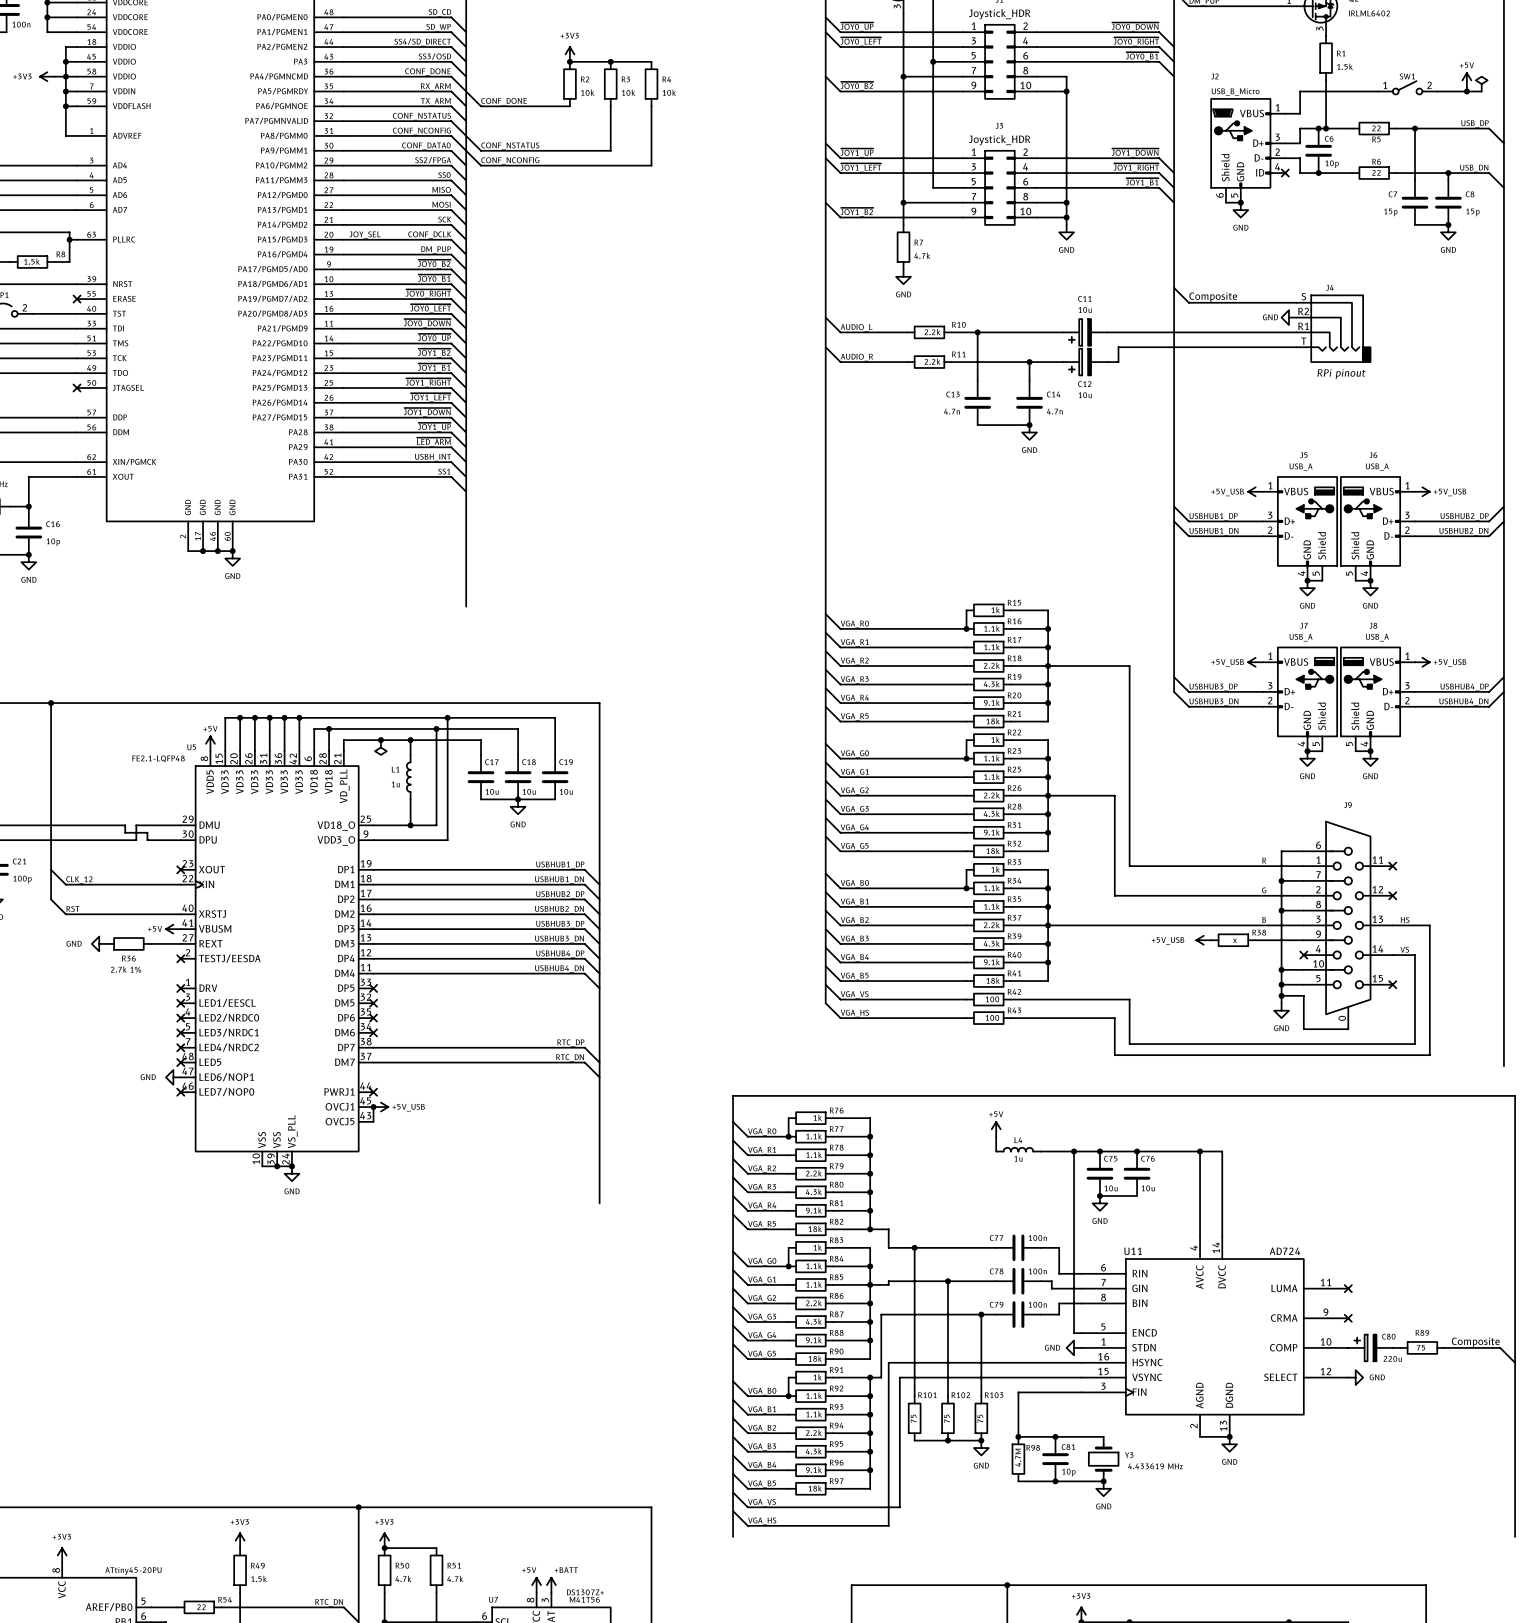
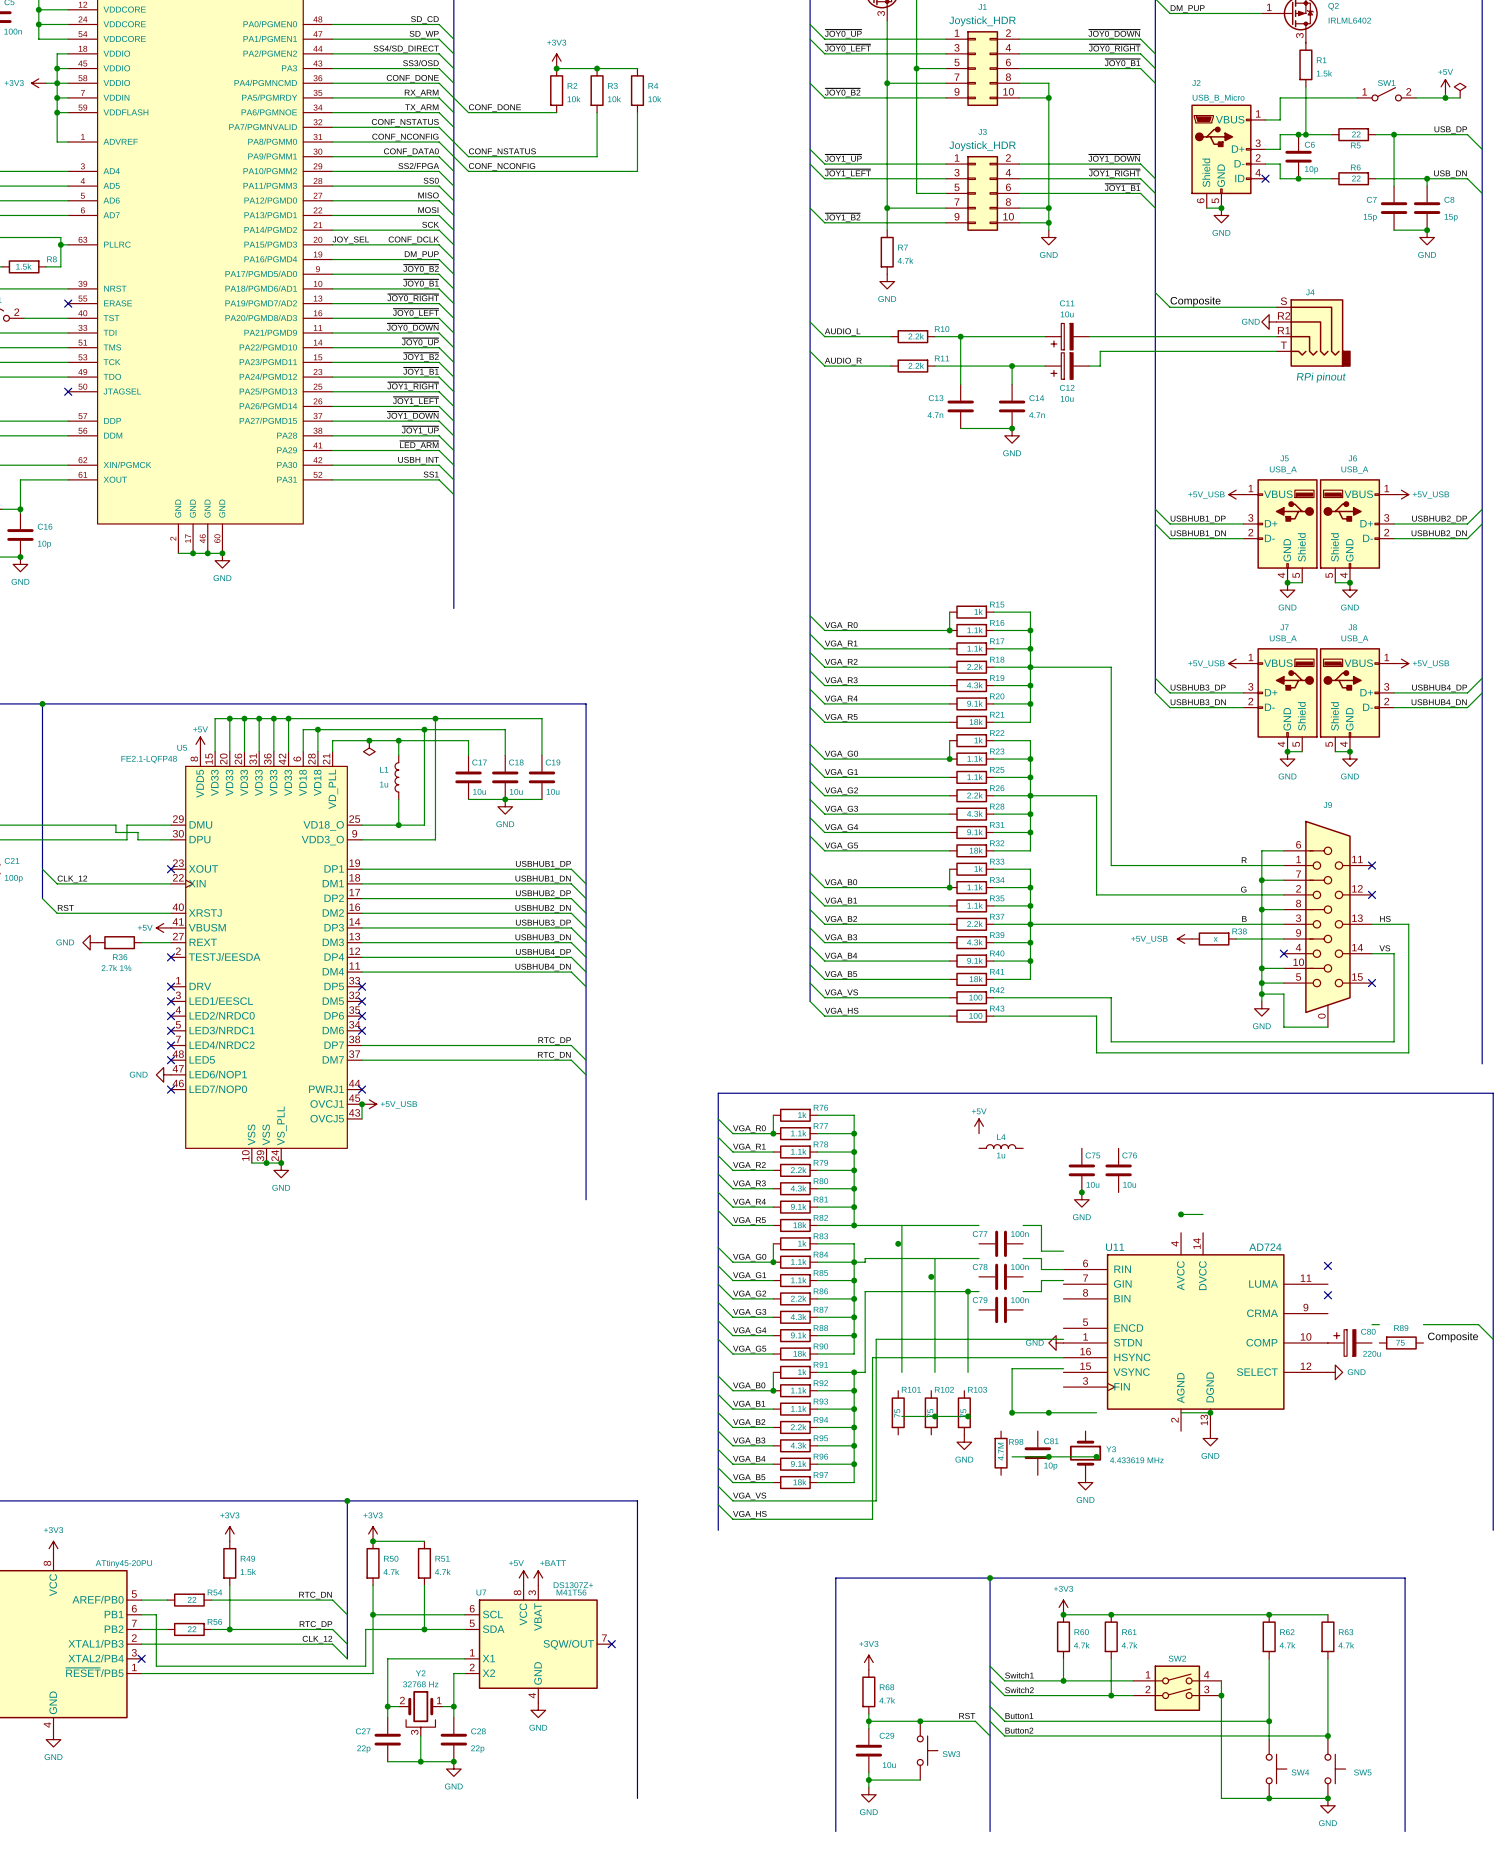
wire: (996, 1136) (996, 1151) -> none
wire: (1040, 1151) (1222, 1151) (1222, 1236) -> none
wire: (1074, 1151) (1074, 1333) (1081, 1333) -> none
junction: (1074, 1151) -> none
junction: (1099, 1151) -> none
junction: (1137, 1151) -> none
wire: (1200, 1151) (1200, 1236) -> none
junction: (1200, 1151) -> none
wire: (1099, 1195) (1137, 1195) -> none
wire: none -> (1181, 1214) (1203, 1214)
junction: none -> (1181, 1214)
wire: (888, 1229) (888, 1247) (996, 1247) -> (872, 1225) (979, 1225)
wire: (914, 1247) (914, 1396) -> (901, 1225) (901, 1372)
wire: (1040, 1247) (1059, 1247) -> (1023, 1225) (1041, 1225) (1041, 1243)
wire: (1059, 1255) (1059, 1262) -> (1023, 1258) (1041, 1258)
wire: none -> (1041, 1251) (1063, 1251)
wire: none -> (979, 1258) (865, 1258) (865, 1262) (854, 1262)
no-connect mark: none -> (1327, 1265)
wire: (948, 1281) (948, 1396) -> (934, 1258) (934, 1372)
wire: (996, 1281) (888, 1281) (888, 1284) (870, 1284) -> none
wire: (1040, 1281) (1051, 1281) (1051, 1288) (1081, 1288) -> none
no-connect mark: (1348, 1288) -> none
no-connect mark: none -> (1327, 1295)
wire: (1081, 1303) (1059, 1303) (1059, 1314) (1040, 1314) -> (1063, 1280) (1041, 1280) (1041, 1291) (1023, 1291)
wire: (881, 1314) (996, 1314) -> (865, 1309) (865, 1291) (979, 1291)
wire: (981, 1314) (981, 1396) -> (968, 1291) (968, 1372)
junction position: (981, 1314) -> (968, 1291)
no-connect mark: (1348, 1318) -> none
wire: (1392, 1347) (1400, 1347) -> (1372, 1324) (1379, 1324)
wire: (1444, 1347) (1500, 1347) (1515, 1362) -> (1423, 1324) (1478, 1324) (1493, 1339)
wire: none -> (1063, 1368) (1012, 1368) (1012, 1412) (1096, 1412)
wire: (1081, 1377) (899, 1377) (899, 1507) (892, 1507) -> (1063, 1339) (876, 1339) (876, 1500)
wire: (1081, 1392) (1018, 1392) (1018, 1436) (1103, 1436) -> none
junction: none -> (1012, 1412)
junction: none -> (1048, 1412)
junction: none -> (934, 1416)
junction: none -> (968, 1416)
junction: (1018, 1436) -> none
junction: (1055, 1436) -> none
wire: (1200, 1436) (1229, 1436) -> (1181, 1412) (1210, 1412)
junction position: (1229, 1436) -> (1210, 1412)
wire: (914, 1440) (981, 1440) -> (901, 1416) (968, 1416)
junction: (948, 1440) -> none
junction: (981, 1440) -> none
junction: none -> (1048, 1456)
junction: none -> (1096, 1456)
wire: (1018, 1481) (1103, 1481) -> (1012, 1456) (1096, 1456)
junction: (1055, 1481) -> none
junction: (1103, 1481) -> none

